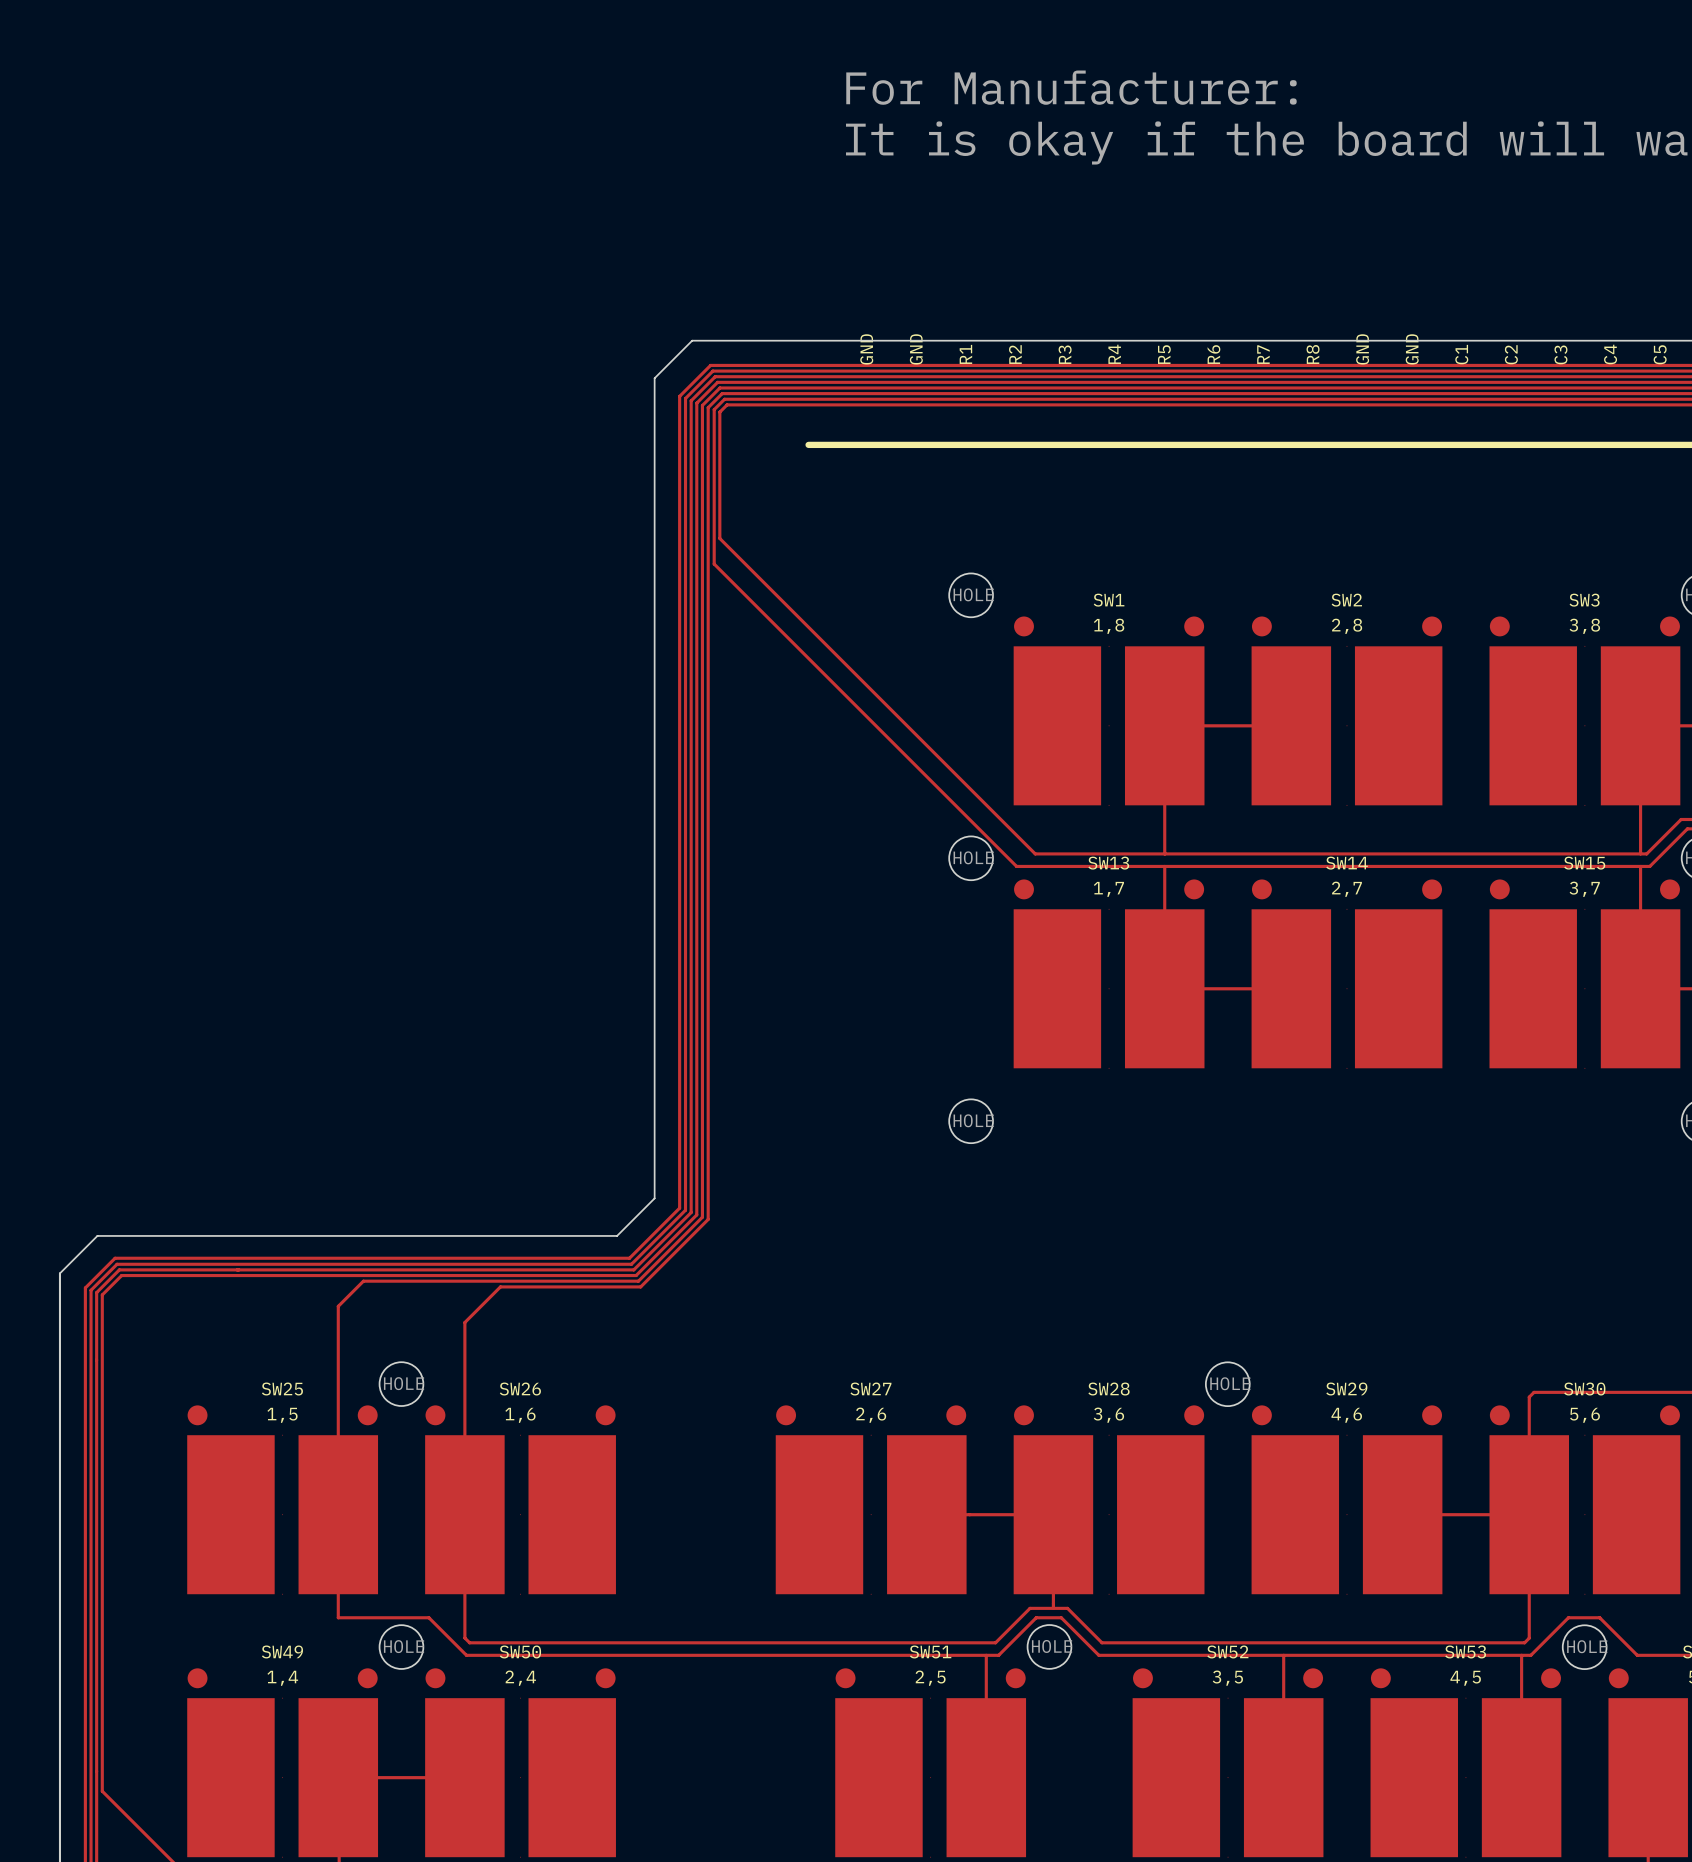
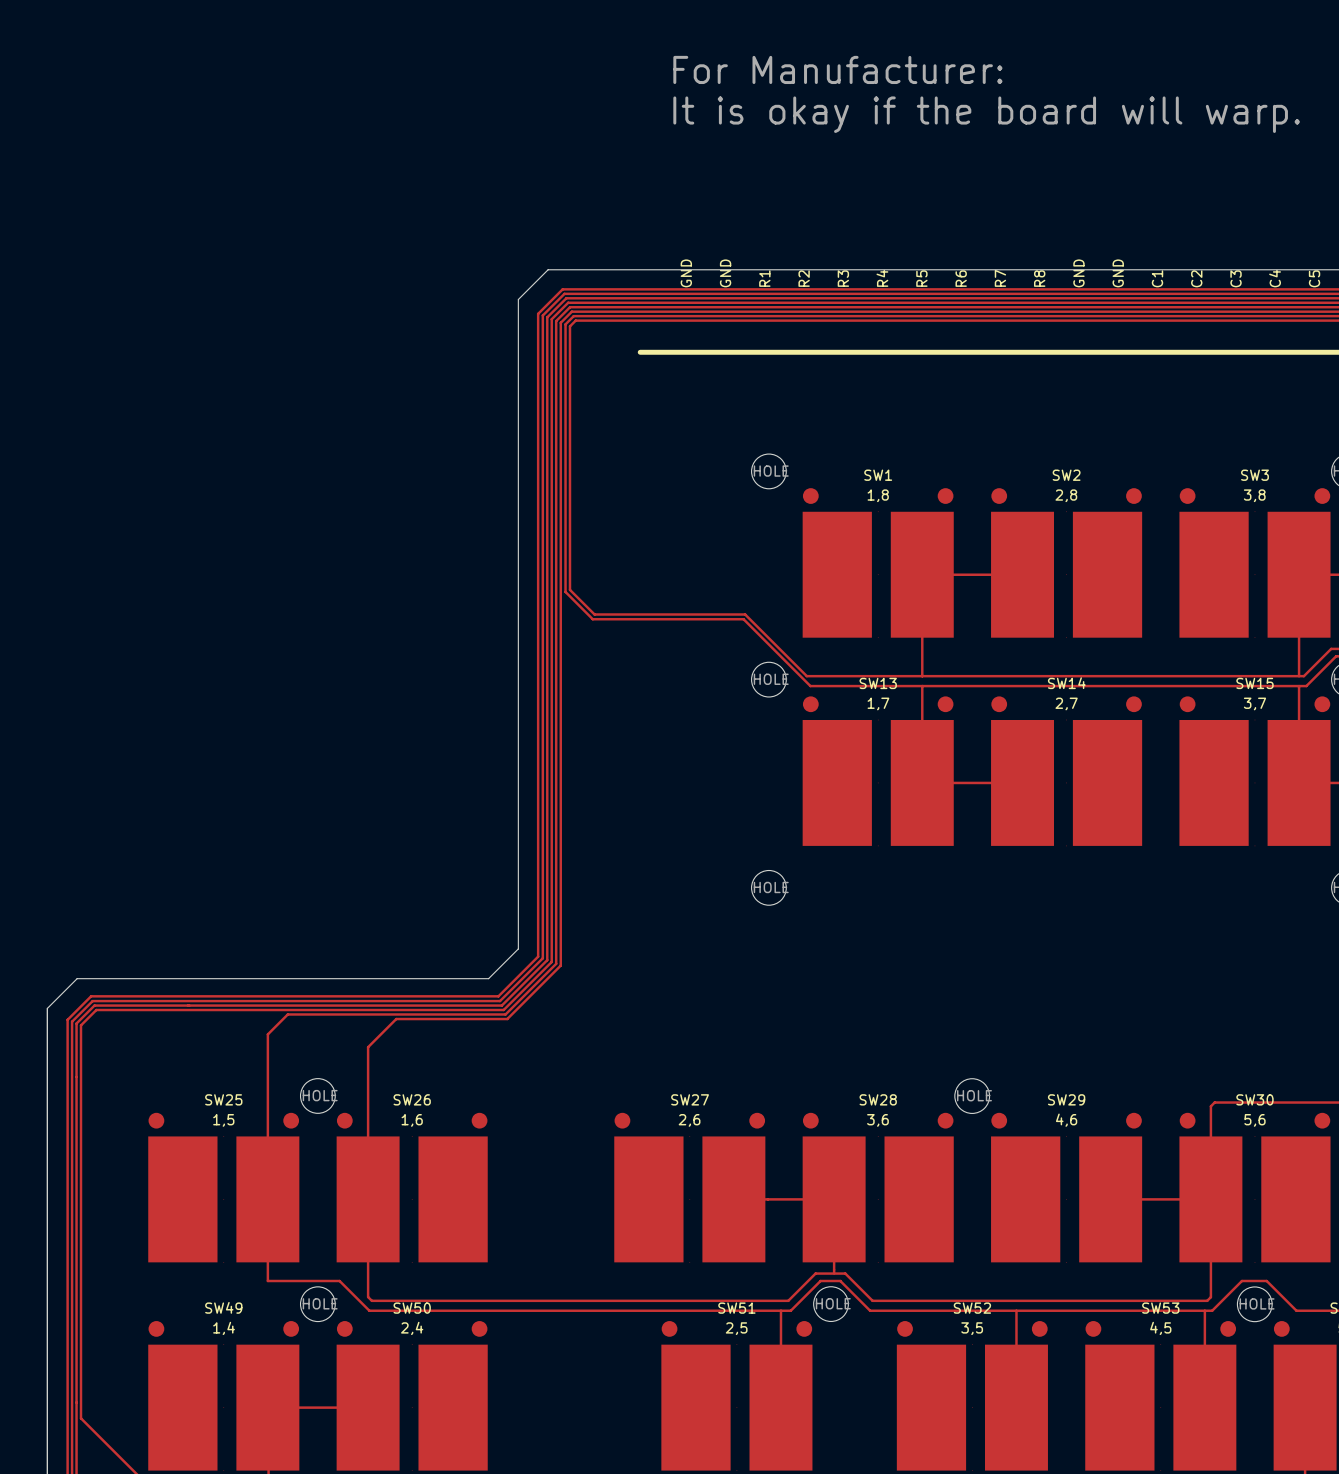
track: (719, 538) (1035, 853) -> (569, 426) (569, 589) (594, 614) (745, 614) (806, 676) (819, 676)
track: (714, 564) (1016, 866) (1023, 866) -> (565, 446) (565, 591) (592, 619) (743, 619) (810, 686)

